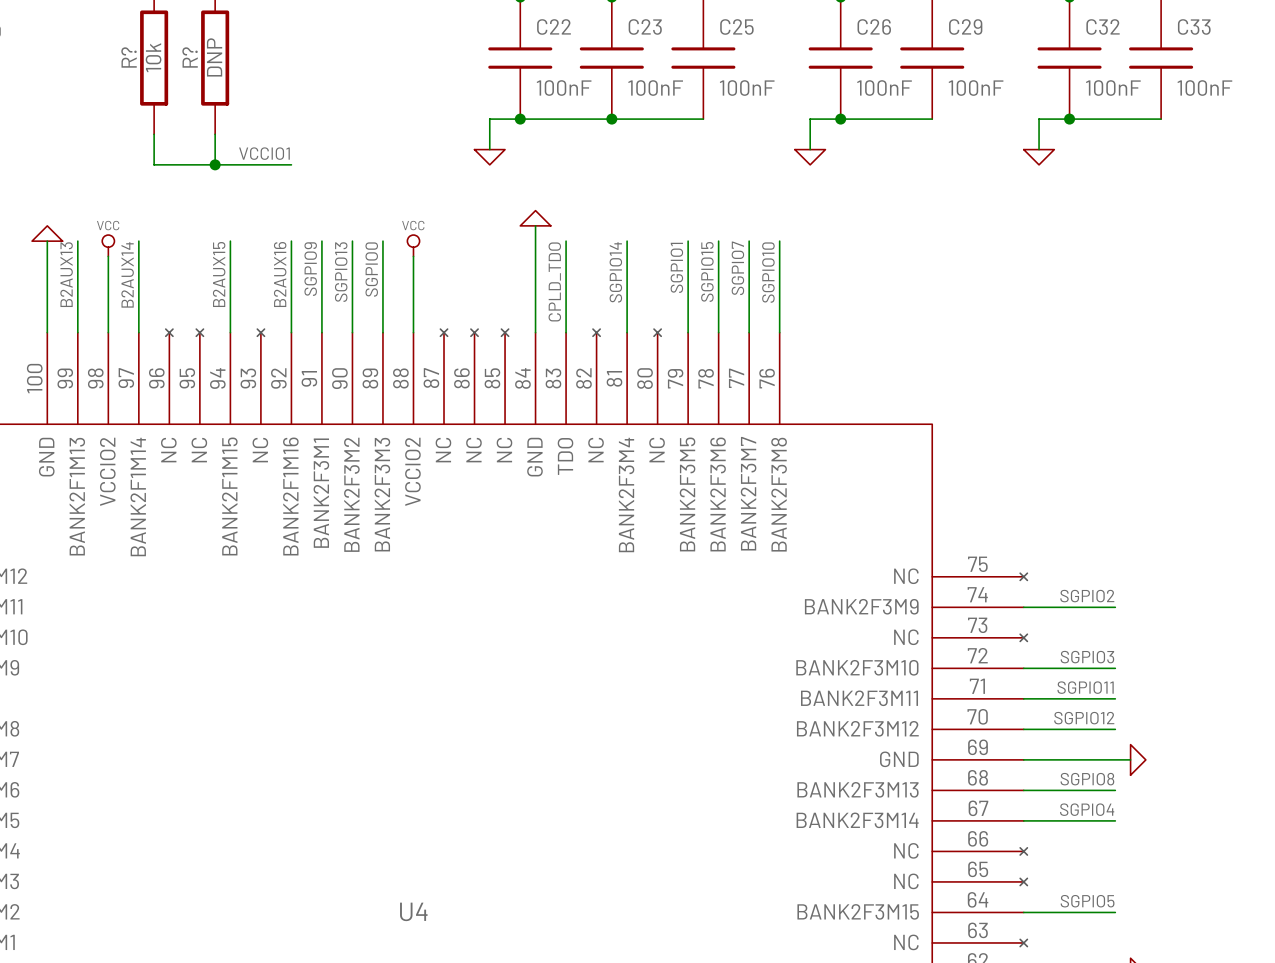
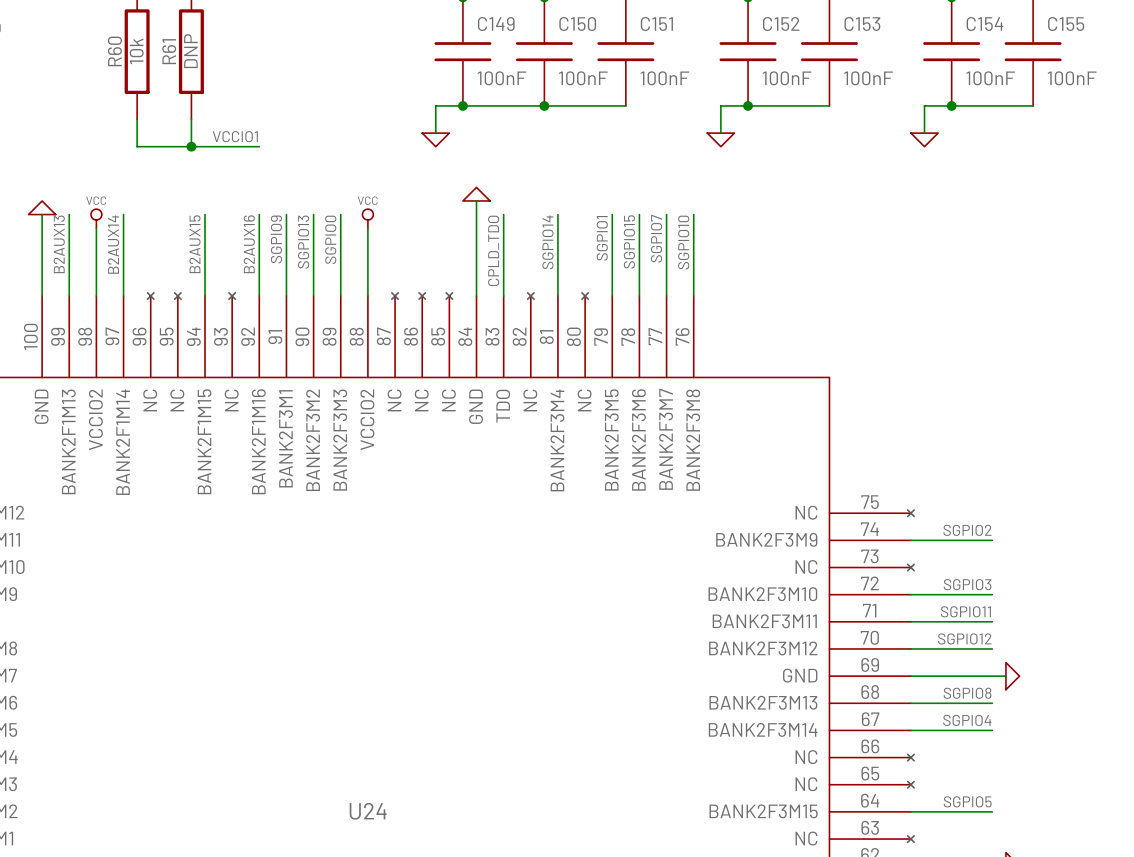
C22 name: C22 (554, 26) -> C149 (496, 24)
C23 name: C23 (645, 26) -> C150 (577, 24)
C25 name: C25 (736, 26) -> C151 (656, 24)
C26 name: C26 (874, 26) -> C152 (781, 24)
C29 name: C29 (965, 26) -> C153 (862, 24)
C32 name: C32 (1103, 26) -> C154 (984, 24)
C33 name: C33 (1194, 26) -> C155 (1066, 24)
R? name: R? (129, 57) -> R60 (114, 51)
R? name: R? (190, 57) -> R61 (169, 51)
U4 name: U4 (413, 911) -> U24 (368, 811)

